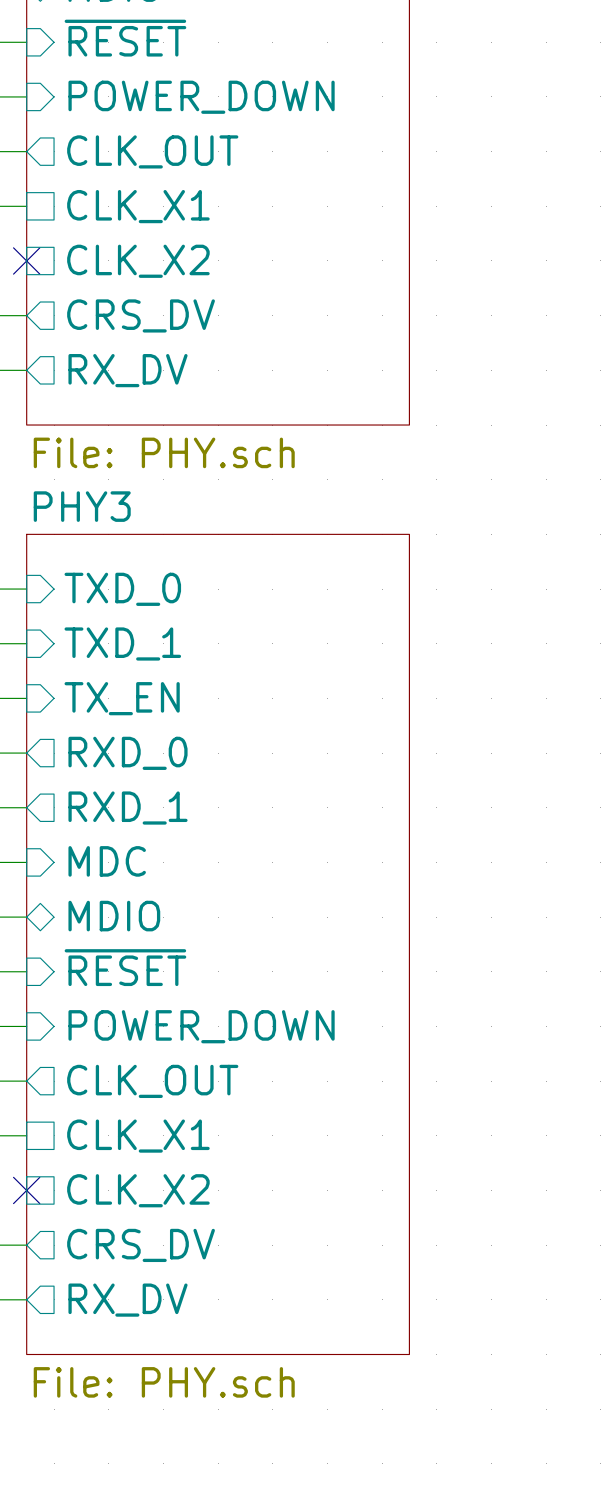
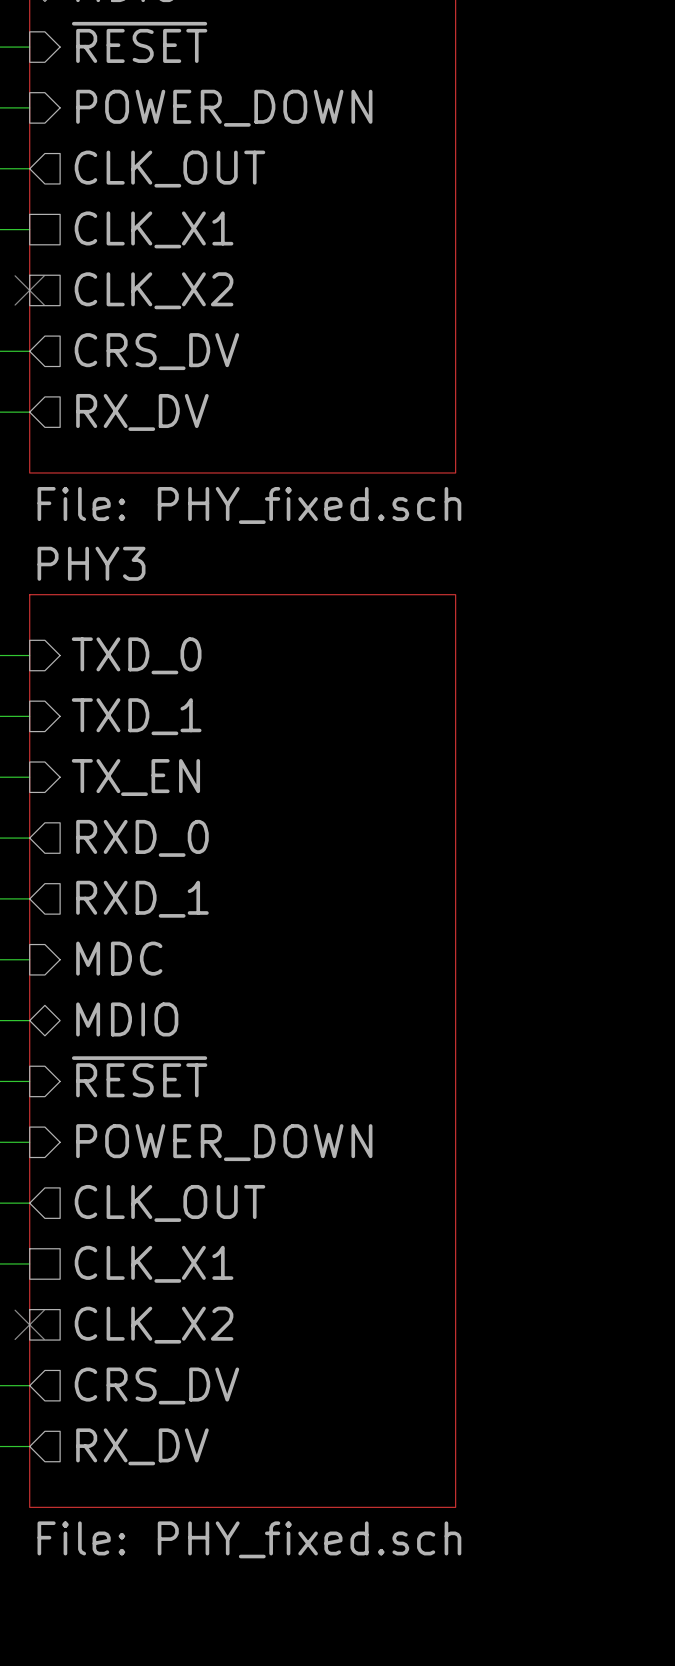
sheet value: File: PHY.sch (164, 452) -> File: PHY_fixed.sch (249, 505)
sheet PHY3 value: File: PHY.sch (164, 1382) -> File: PHY_fixed.sch (249, 1539)

